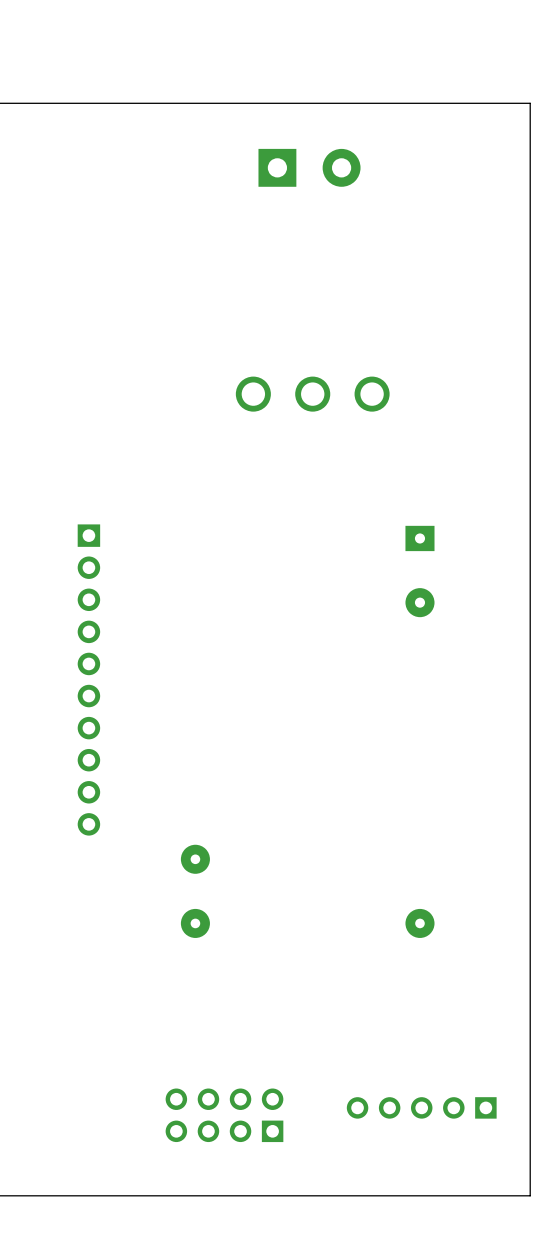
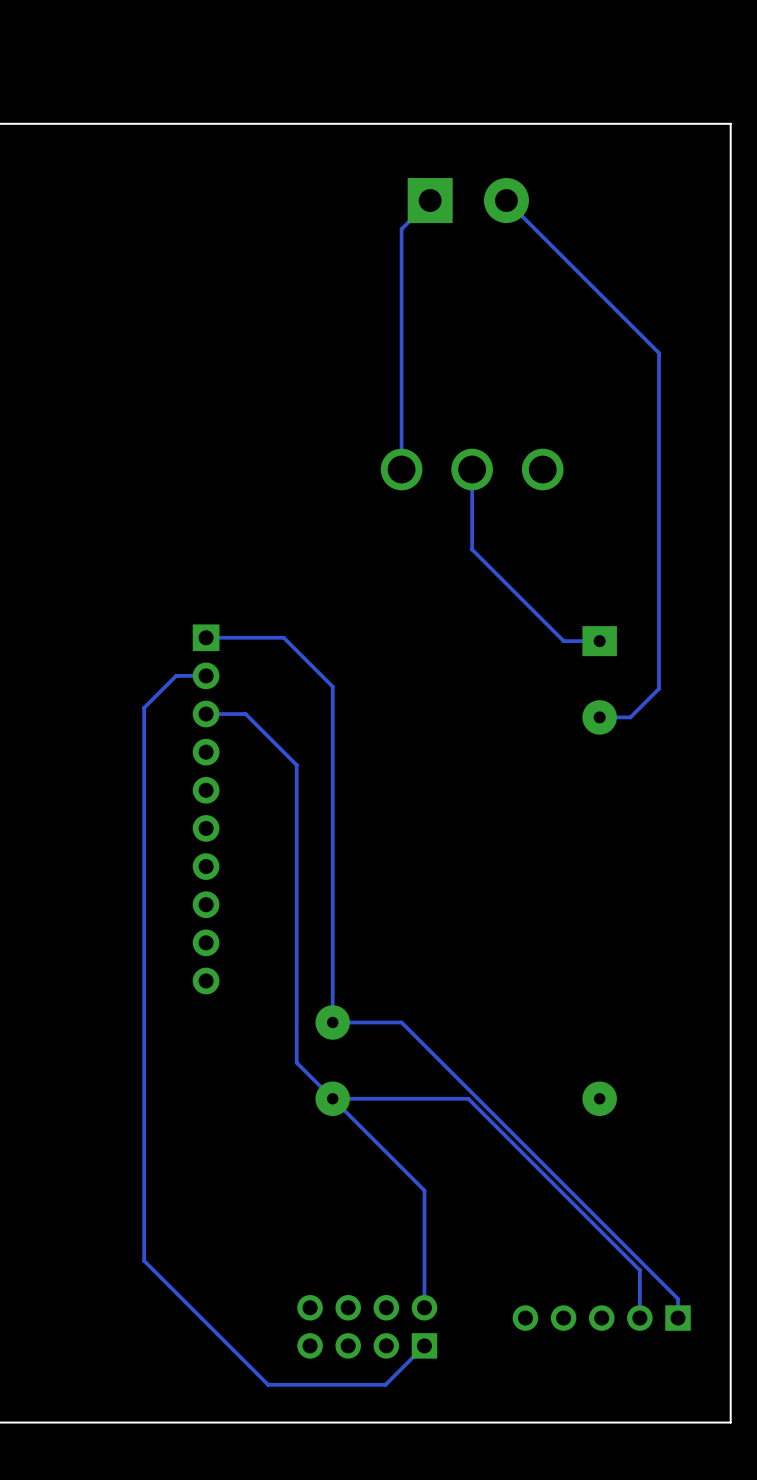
track: none -> (430, 200) (401, 229) (401, 469)
track: none -> (506, 200) (659, 353) (659, 688) (630, 717) (599, 717)
track: none -> (472, 469) (472, 549) (563, 641) (599, 641)
track: none -> (206, 637) (283, 637) (332, 686) (332, 1022) (401, 1022) (678, 1298) (678, 1318)
track: none -> (206, 675) (176, 675) (144, 707) (144, 1260) (268, 1384) (385, 1384) (424, 1345)
track: none -> (206, 714) (245, 714) (296, 765) (296, 1062) (424, 1190) (424, 1307)
track: none -> (332, 1098) (468, 1098) (639, 1270)
track: none -> (639, 1270) (639, 1318)

